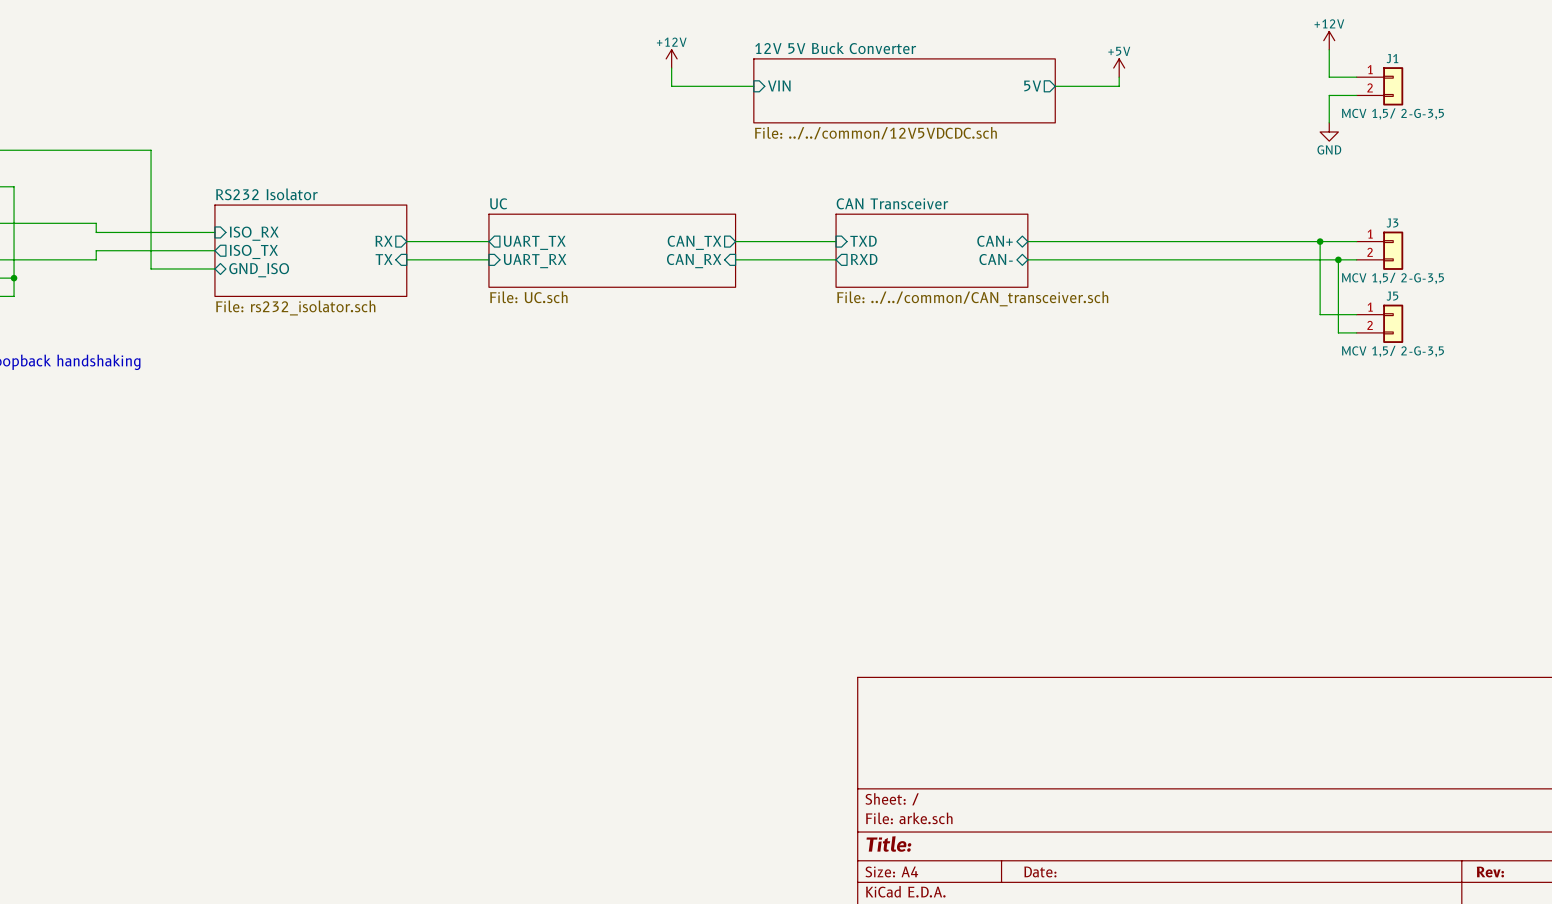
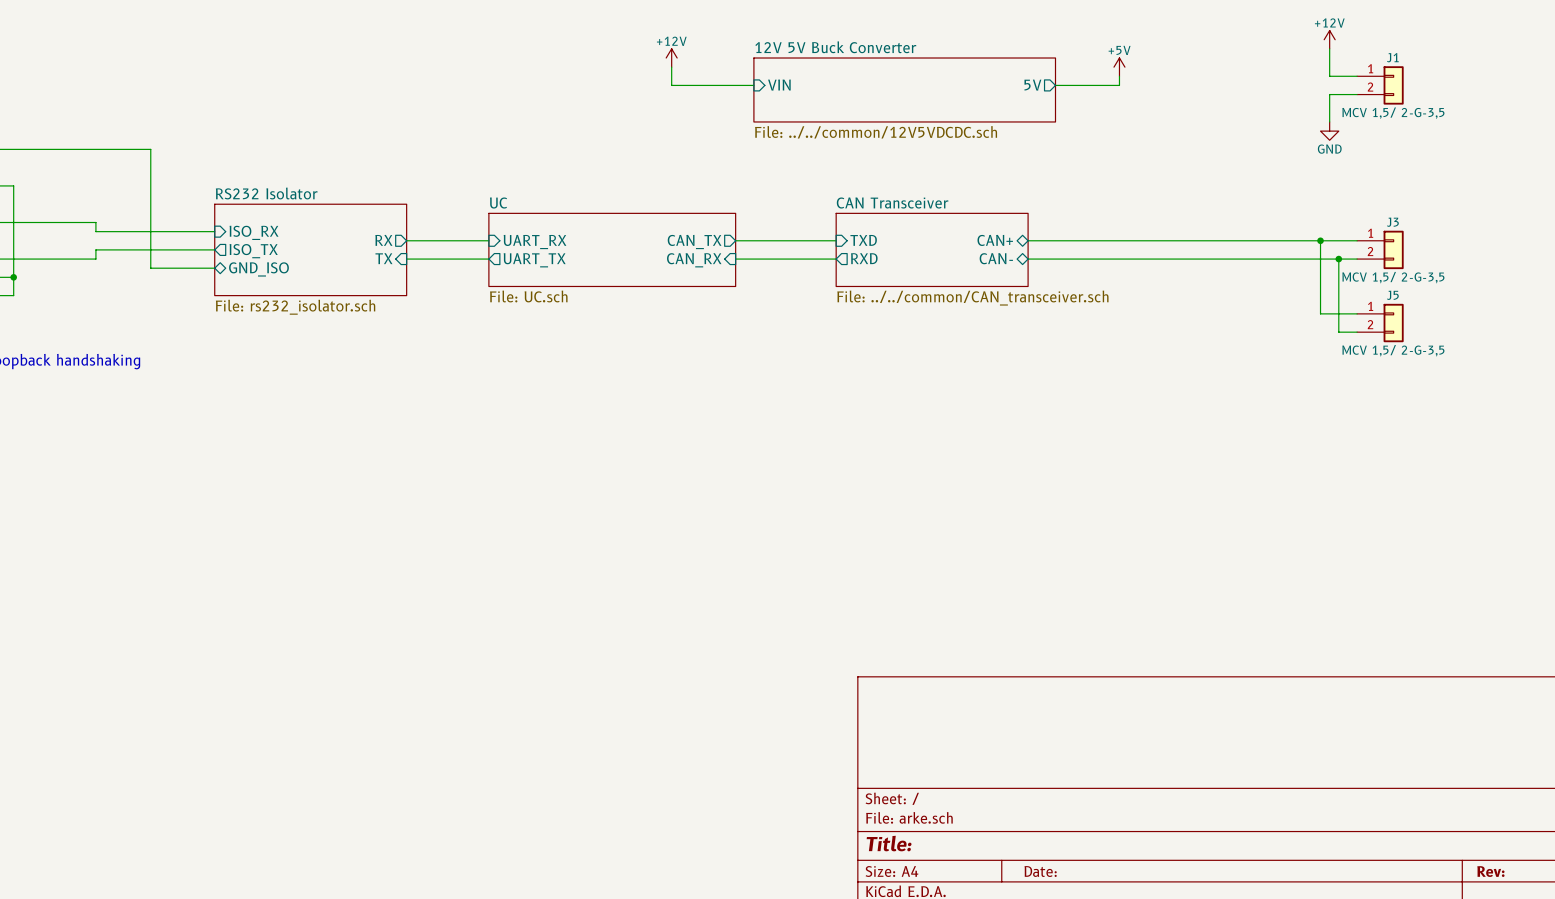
sheet pin shape: output (534, 242) -> input (535, 242)
sheet pin: UART_TX (534, 242) -> UART_RX (535, 242)
sheet pin shape: input (535, 261) -> output (534, 260)
sheet pin: UART_RX (535, 261) -> UART_TX (534, 260)

